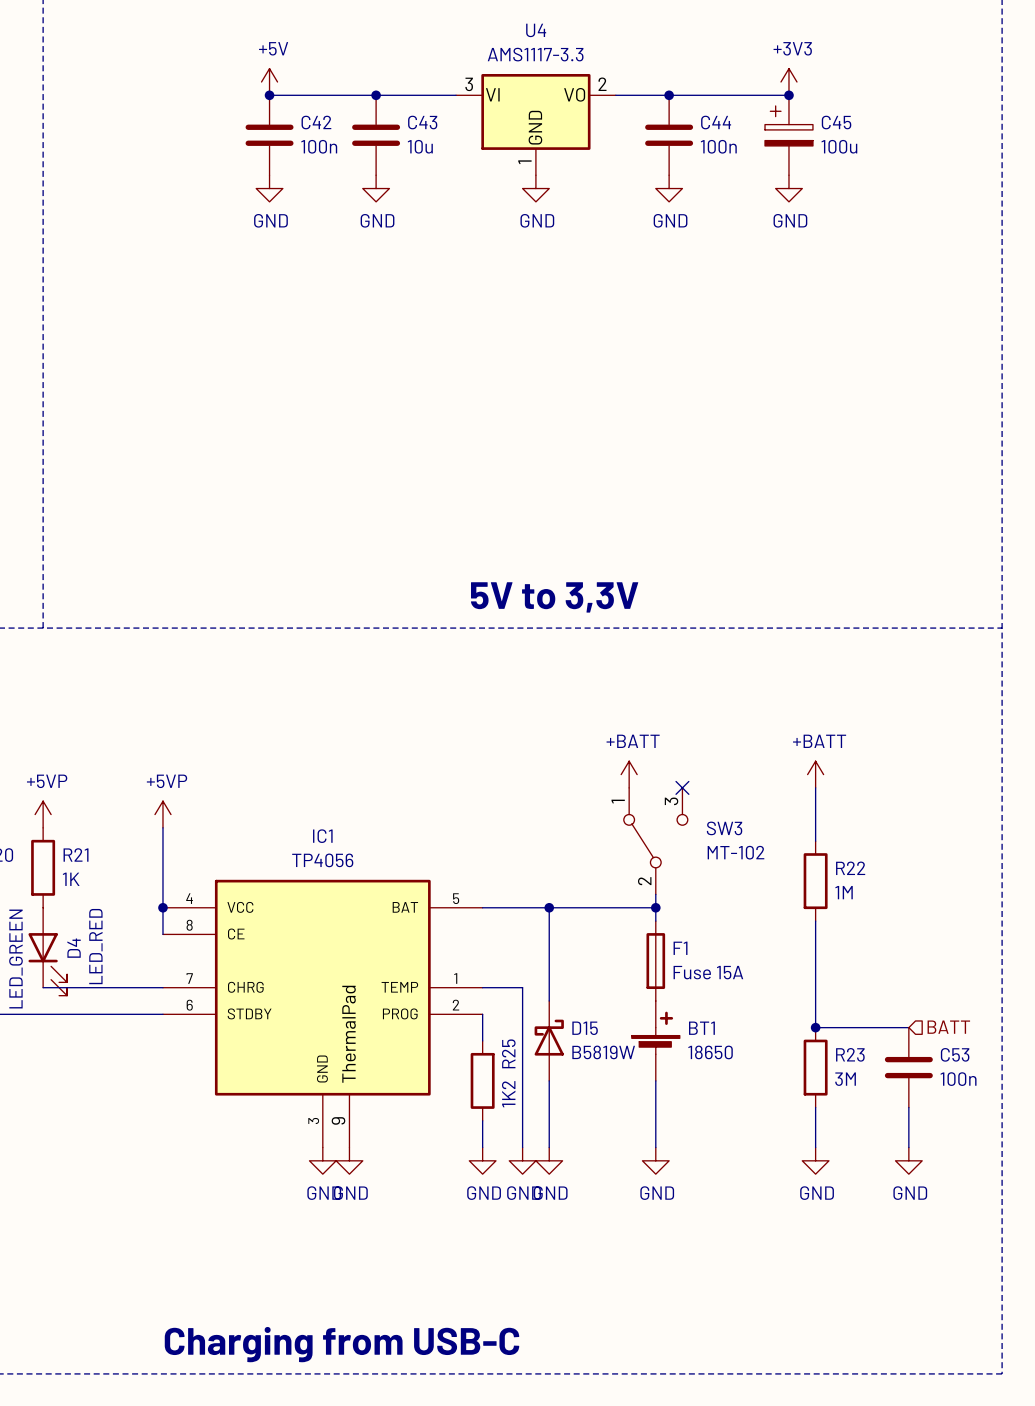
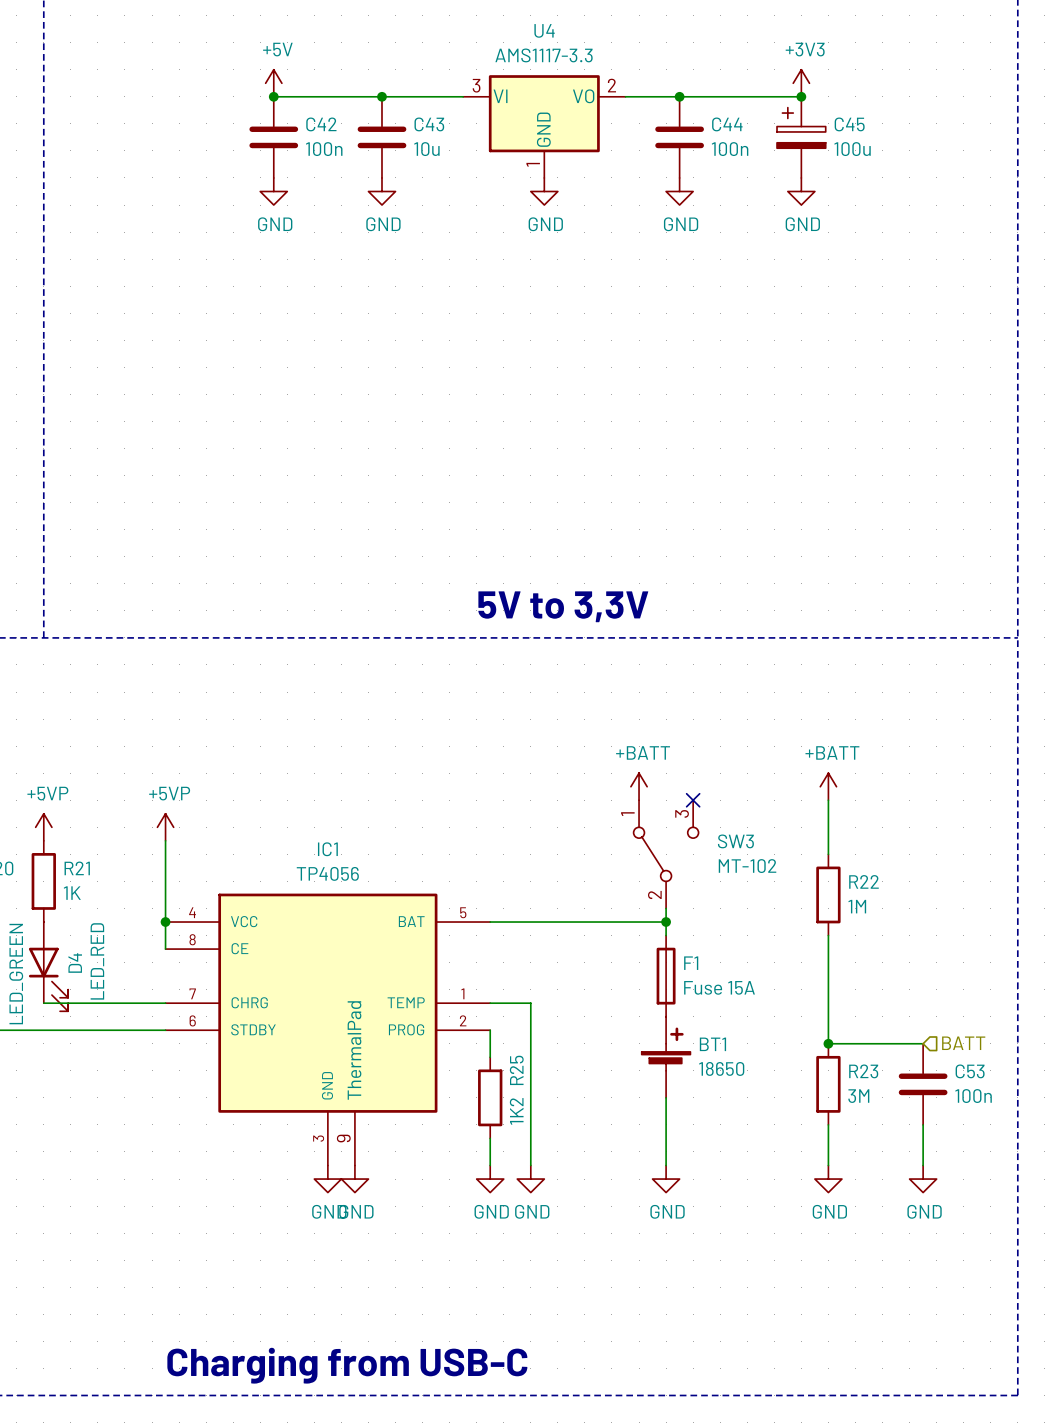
wire: (549, 907) (549, 1001) -> none
junction: (549, 907) -> none
D15: B5819W (549, 1040) -> none
wire: (549, 1080) (549, 1147) -> none
power symbol: GND (549, 1160) -> none

